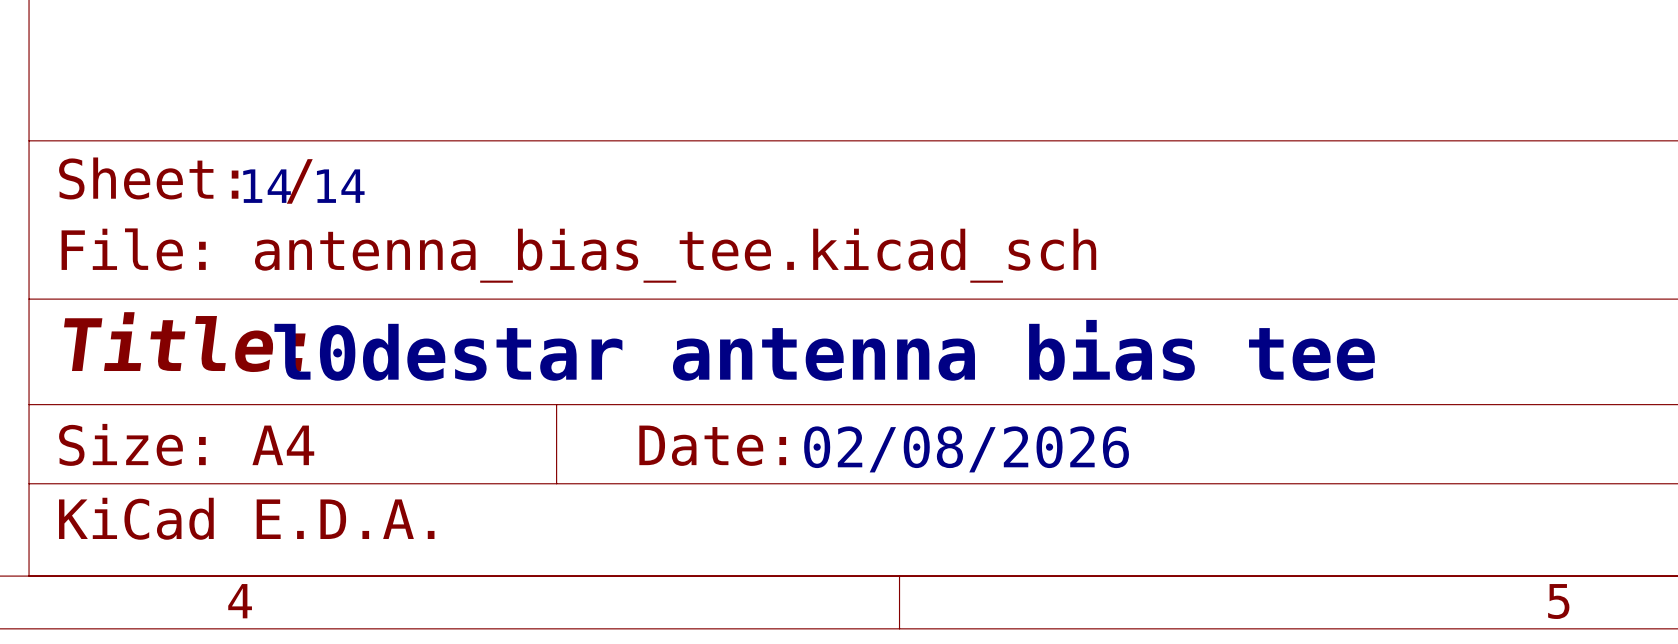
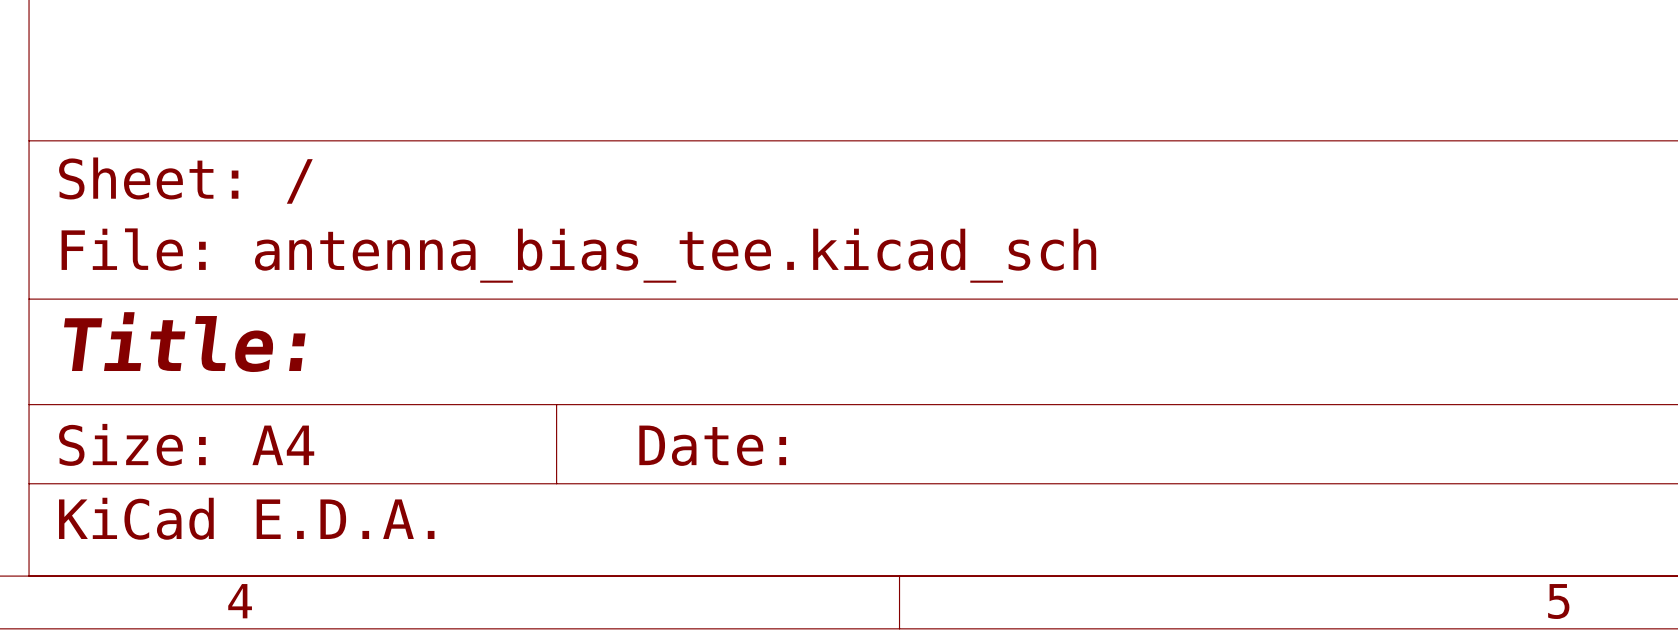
text: 14 (267, 186) -> none
text: 14 (340, 186) -> none
text: l0destar antenna bias tee (824, 350) -> none
text: 02/08/2026 (966, 449) -> none

